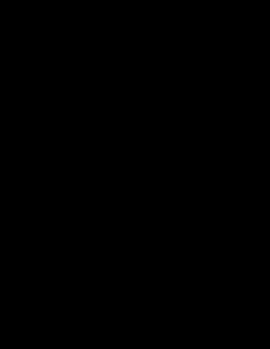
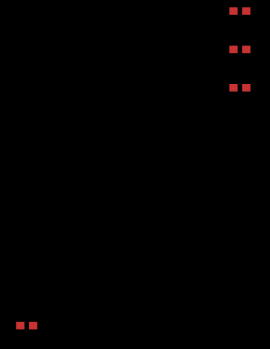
part: none -> (239, 11)
part: none -> (239, 49)
part: none -> (239, 87)
part: none -> (26, 325)

